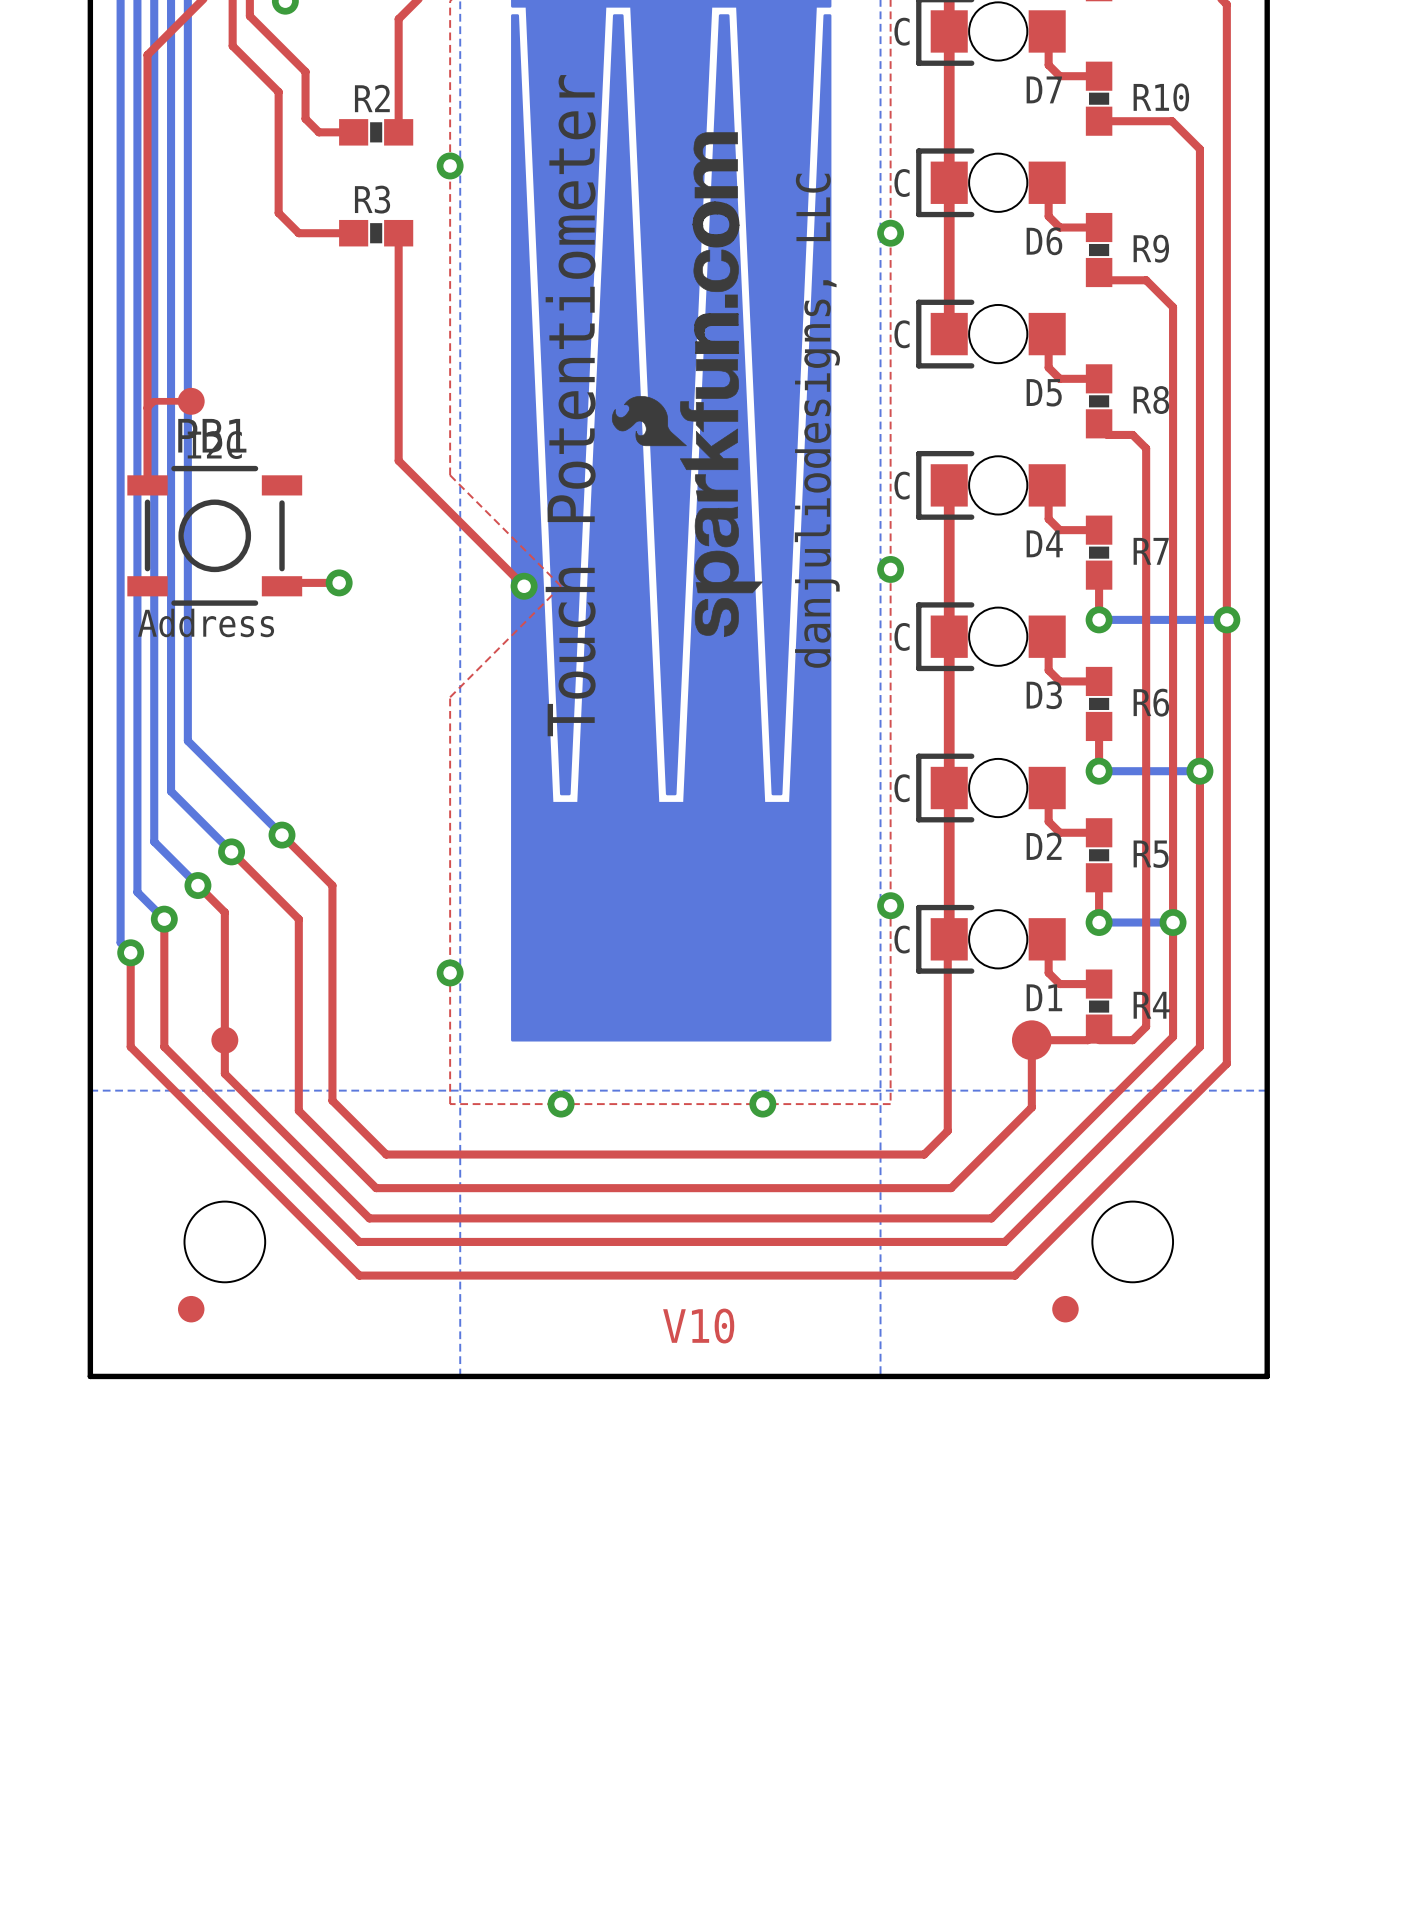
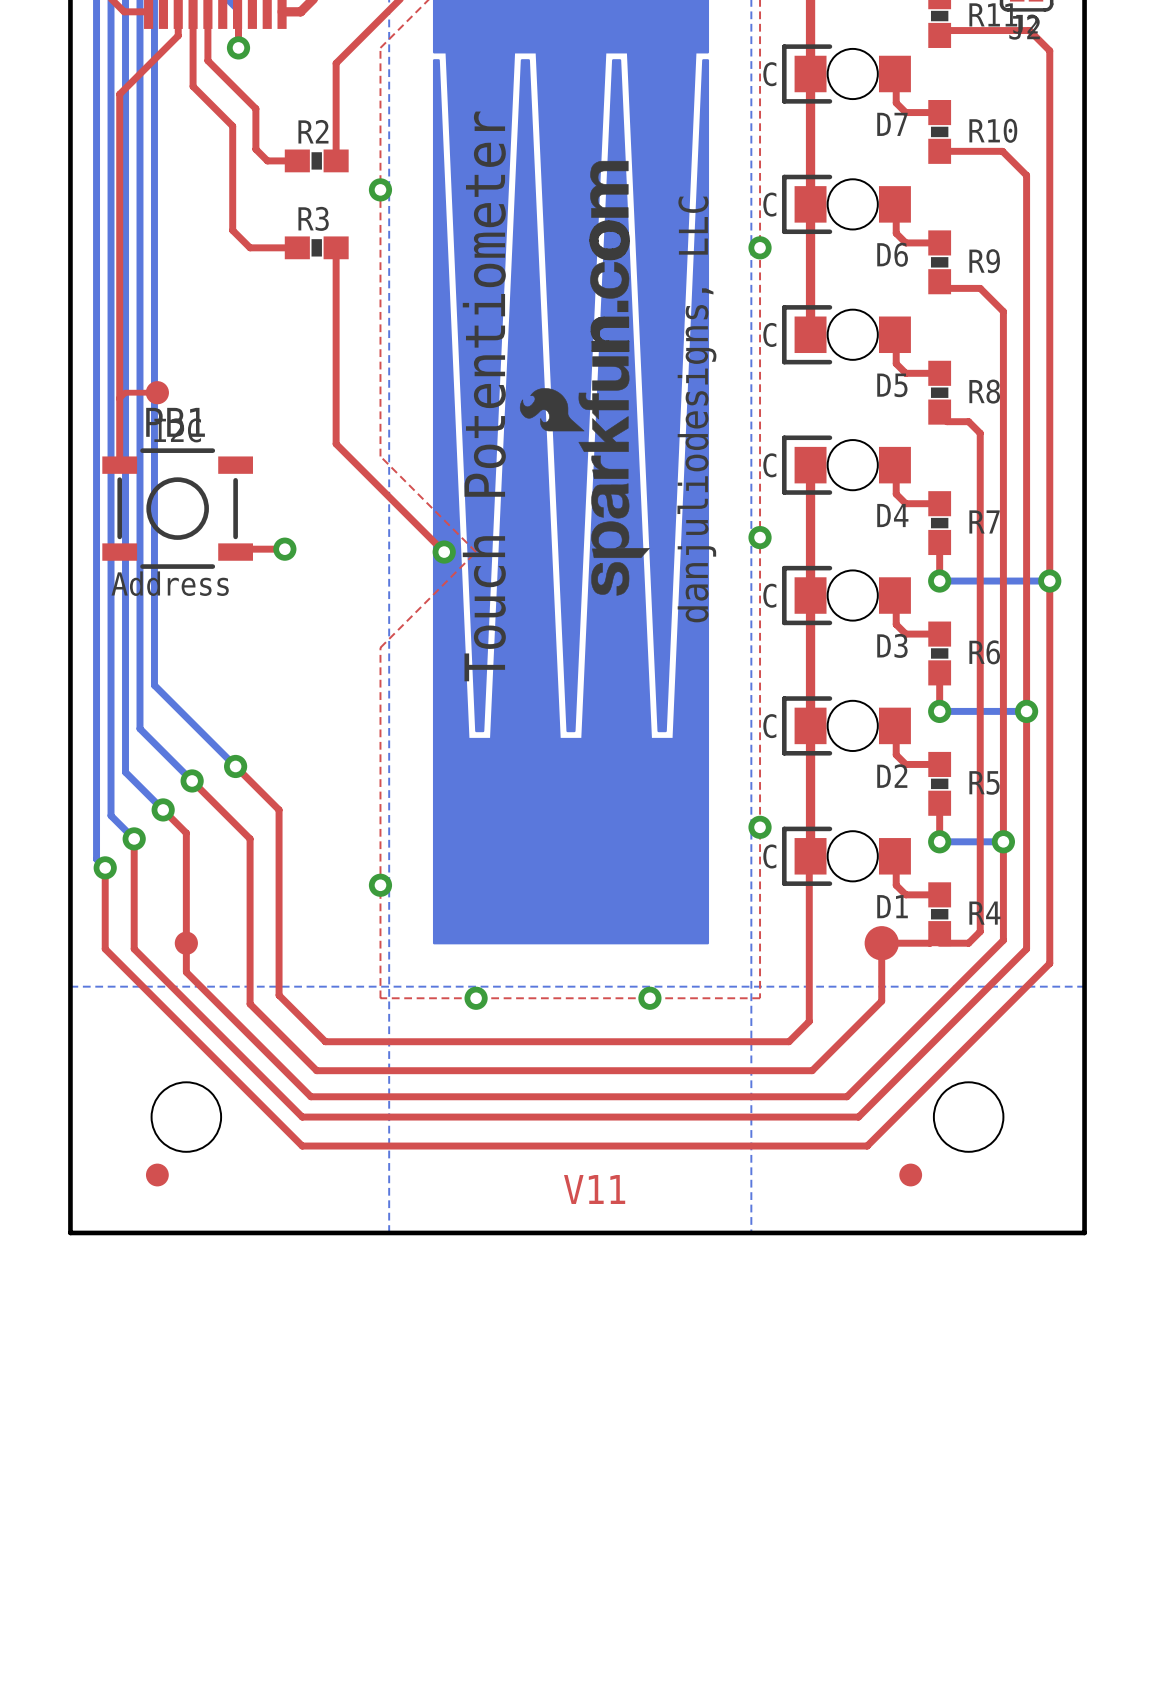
text: V10 (698, 1326) -> V11 (594, 1189)

